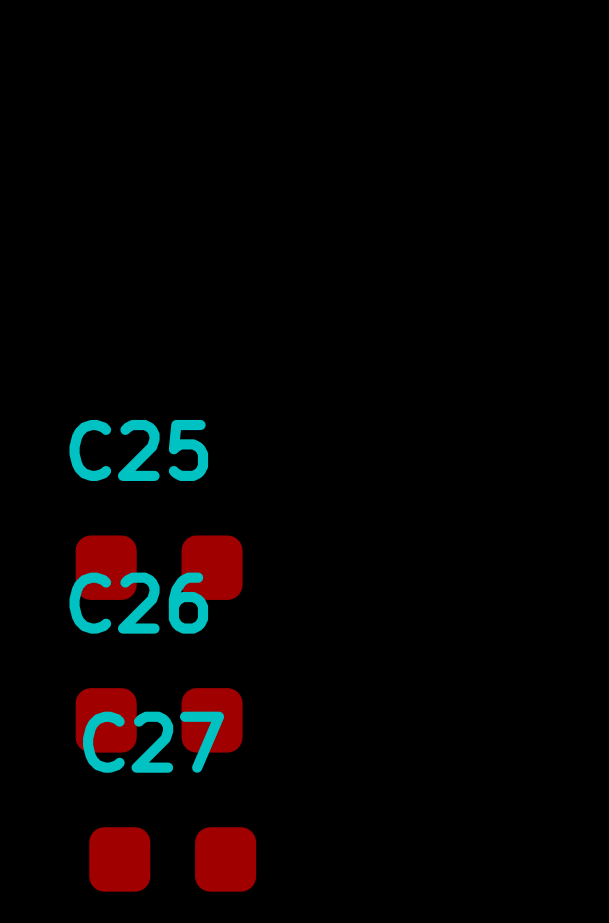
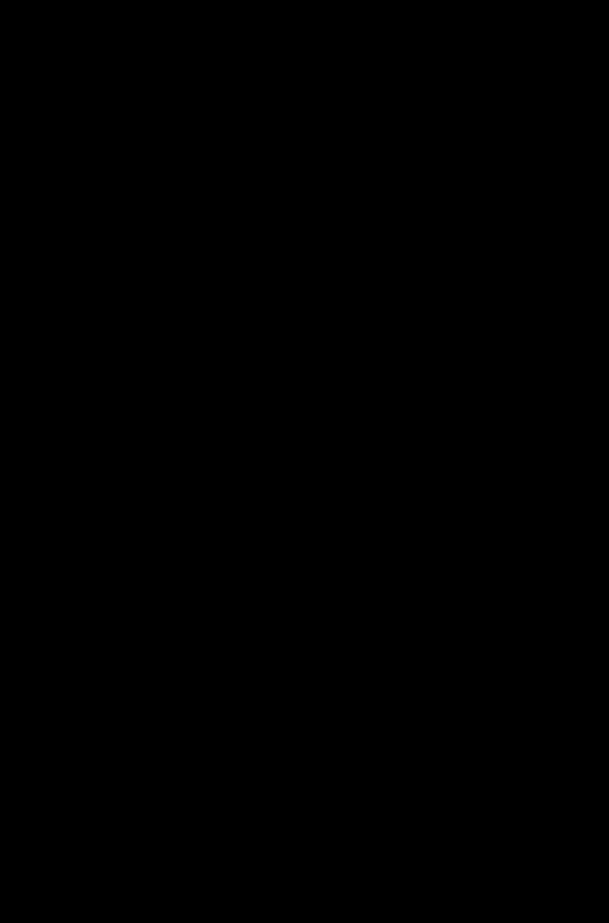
C25: (159, 567) -> none
C26: (159, 720) -> none
C27: (172, 859) -> none

